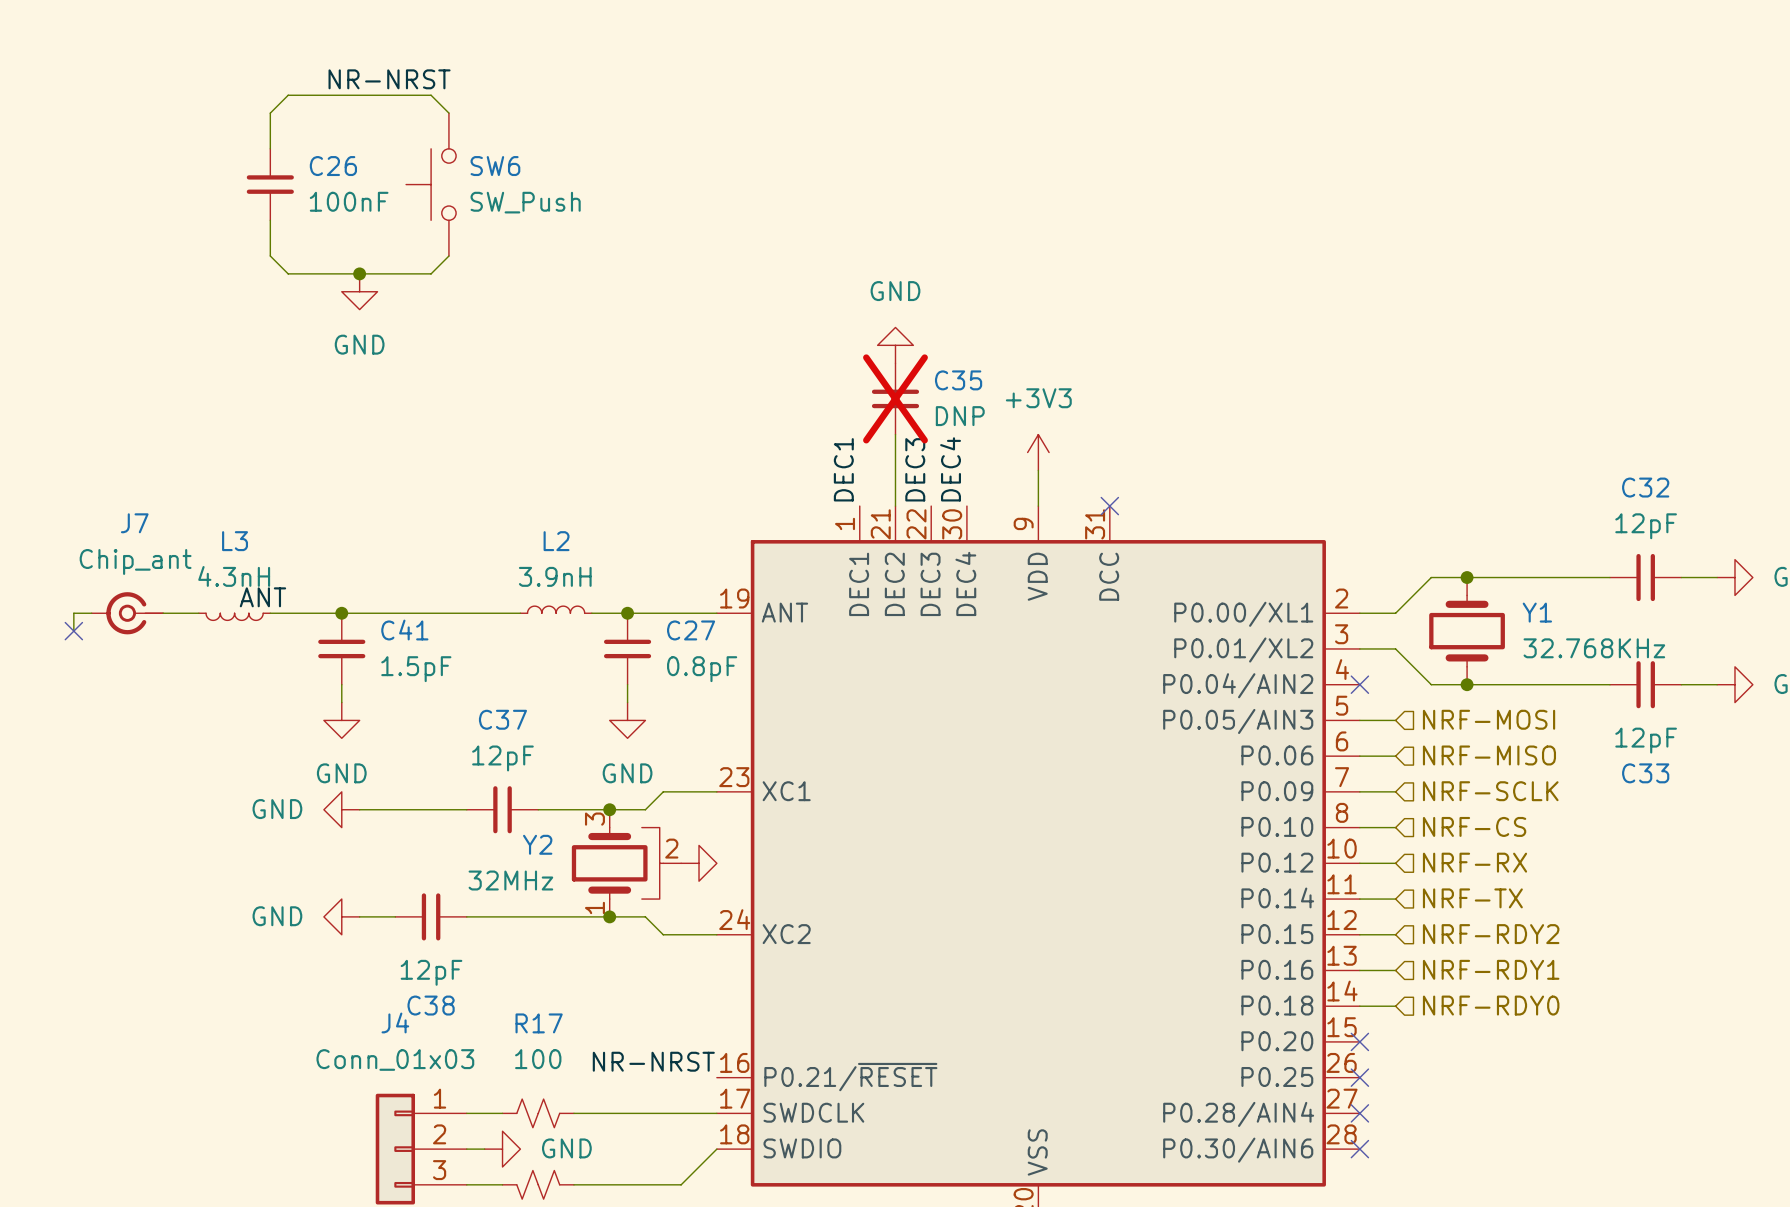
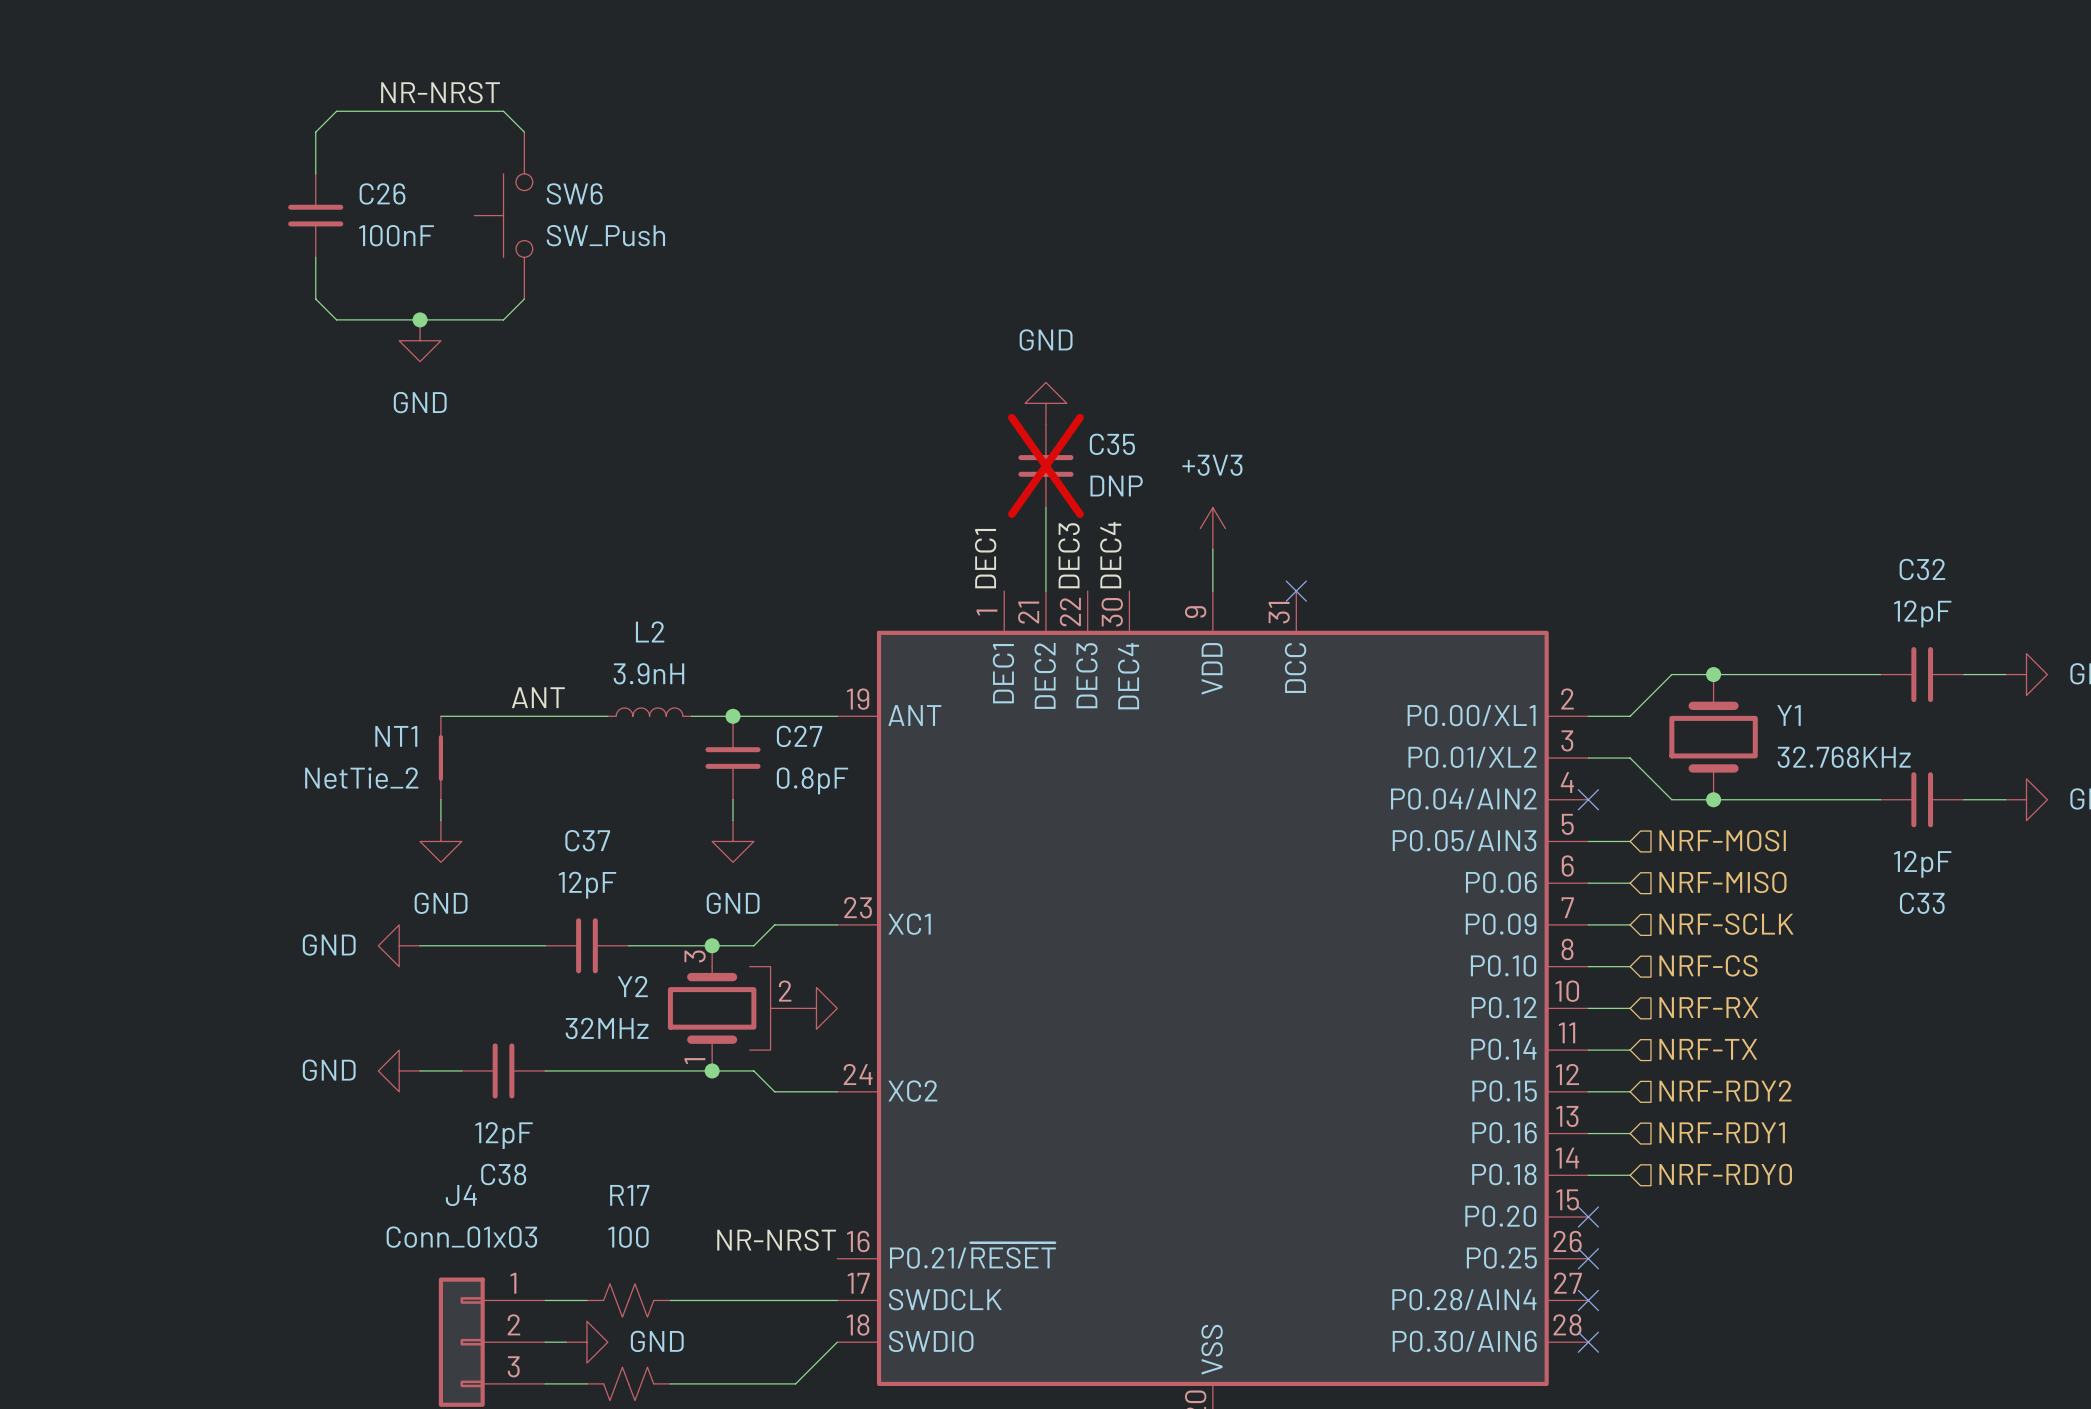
label position: ANT (262, 597) -> ANT (538, 697)
wire: (91, 613) (73, 613) (73, 631) -> none
J7: Chip_ant (127, 613) -> none
wire: (163, 613) (198, 613) -> none
wire: (270, 613) (377, 613) -> none
junction: (341, 613) -> none
L3: 4.3nH (234, 616) -> none
no-connect mark: (73, 631) -> none
C41: 1.5pF (341, 648) -> none
NT1: none -> NetTie_2 (440, 758)
wire: (341, 684) (341, 702) -> (440, 799) (440, 820)
power symbol position: GND (341, 720) -> GND (440, 841)

